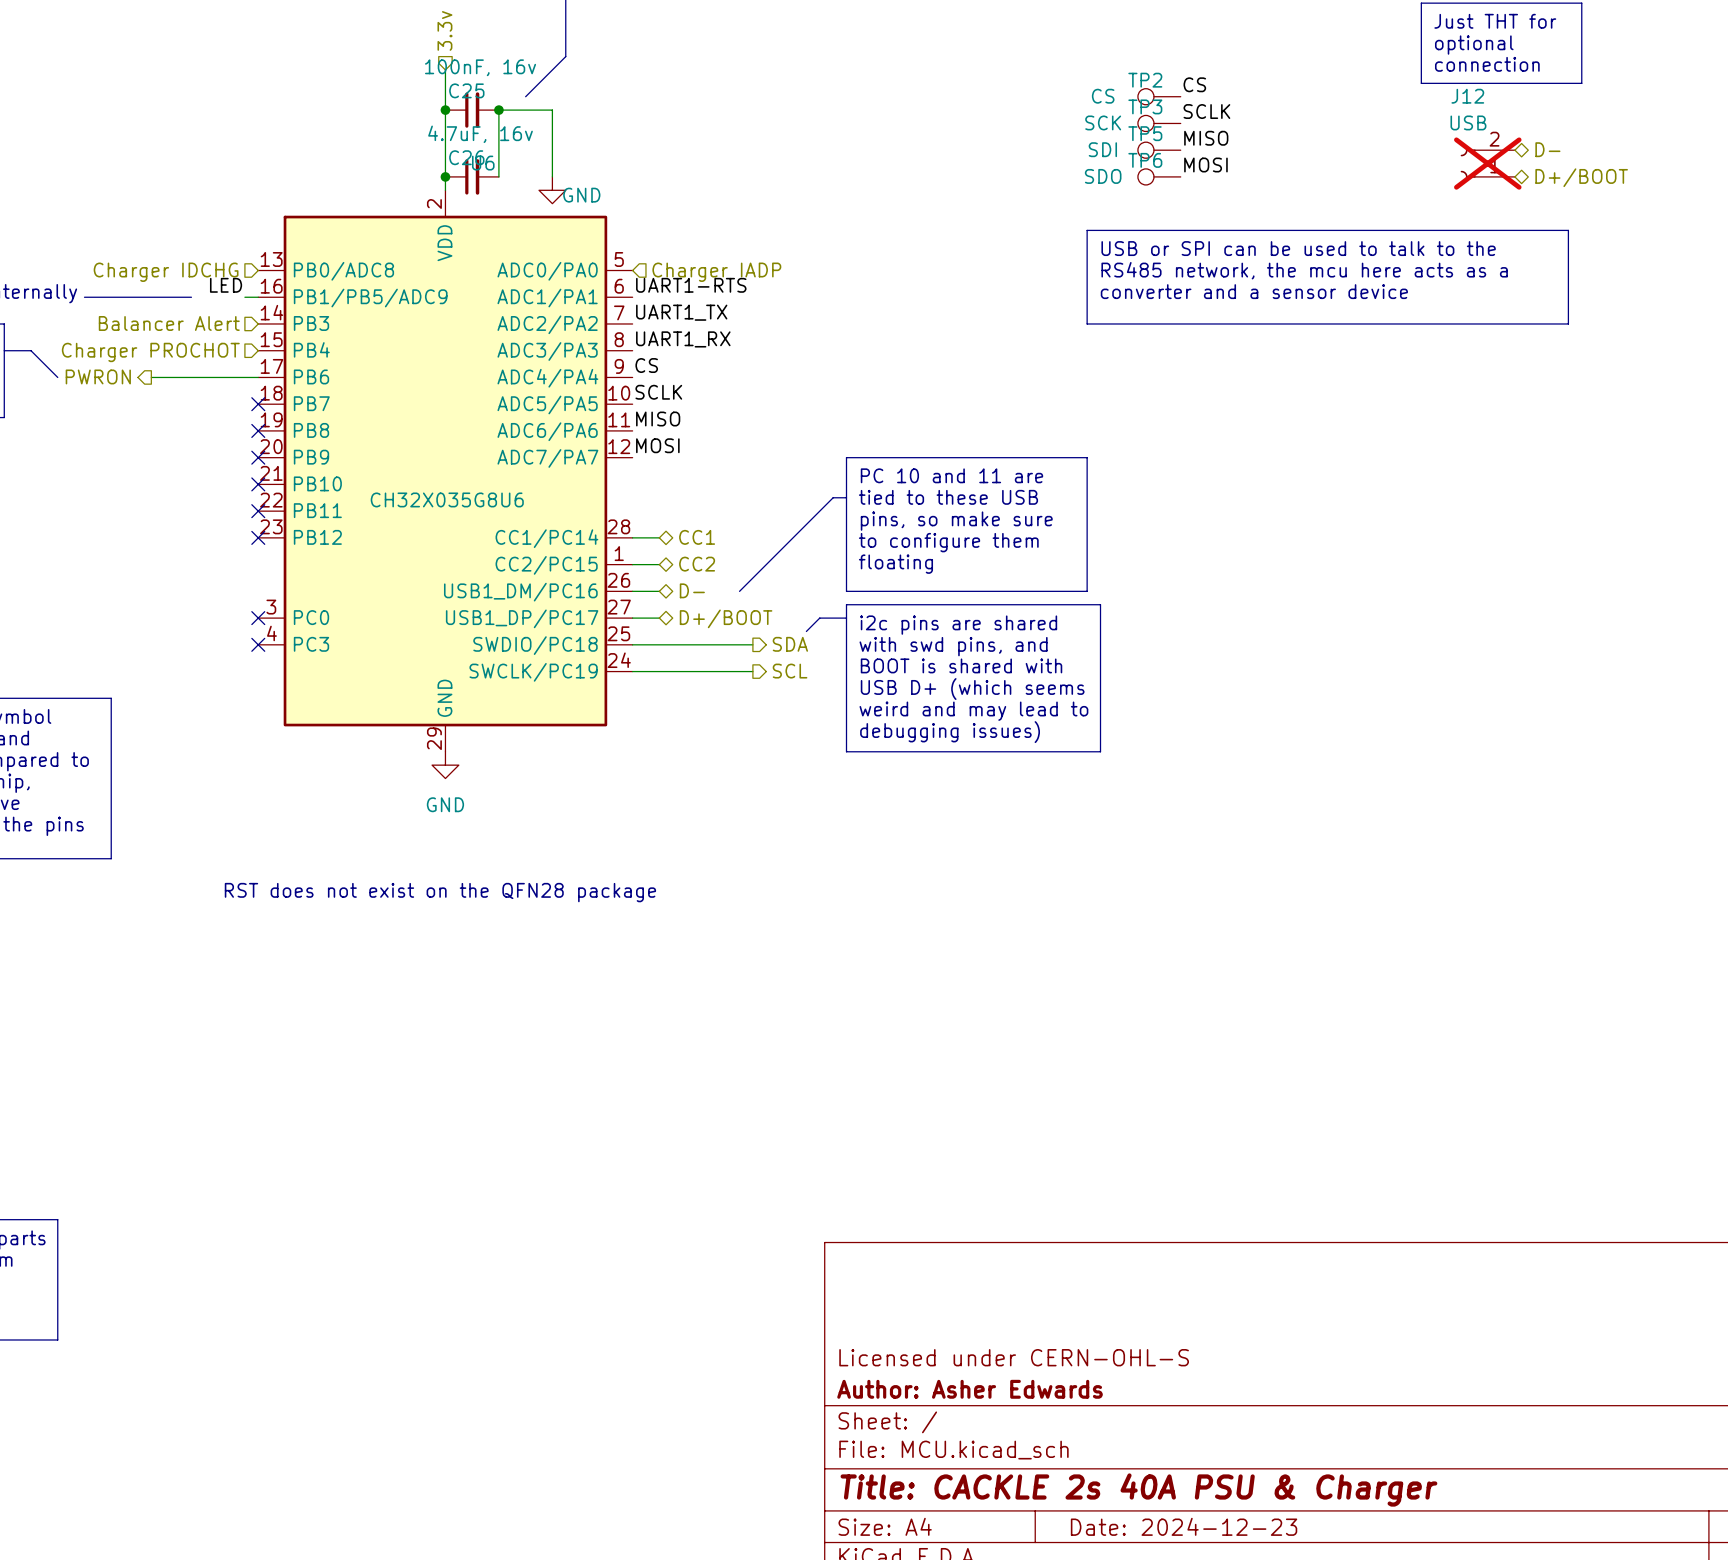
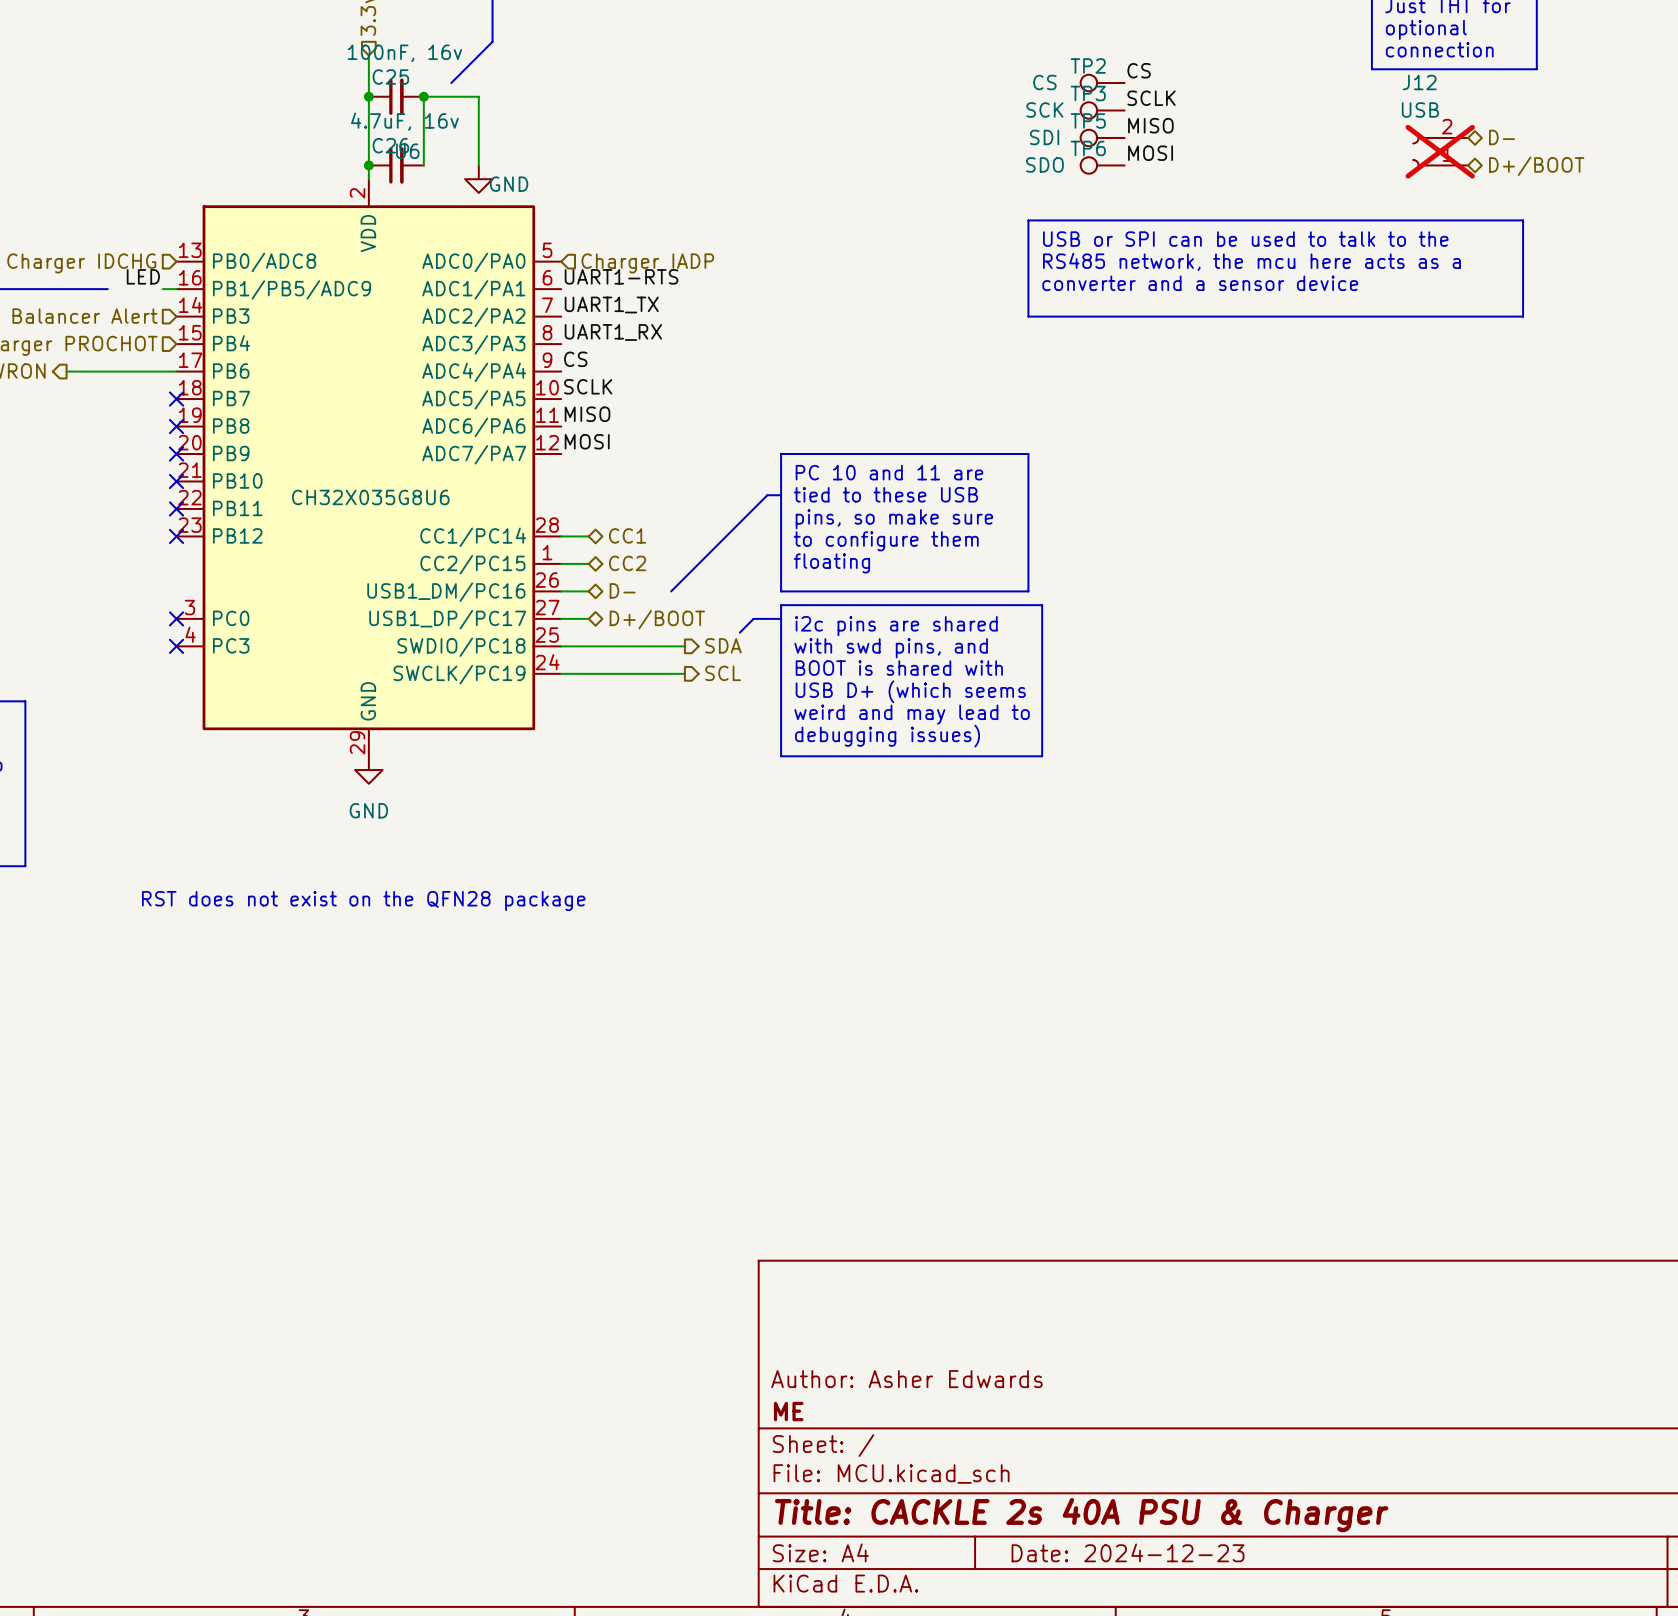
title block: Licensed under CERN-OHL-S (1014, 1357) -> Author: Asher Edwards (907, 1379)
title block: Author: Asher Edwards (970, 1389) -> ME (788, 1411)

